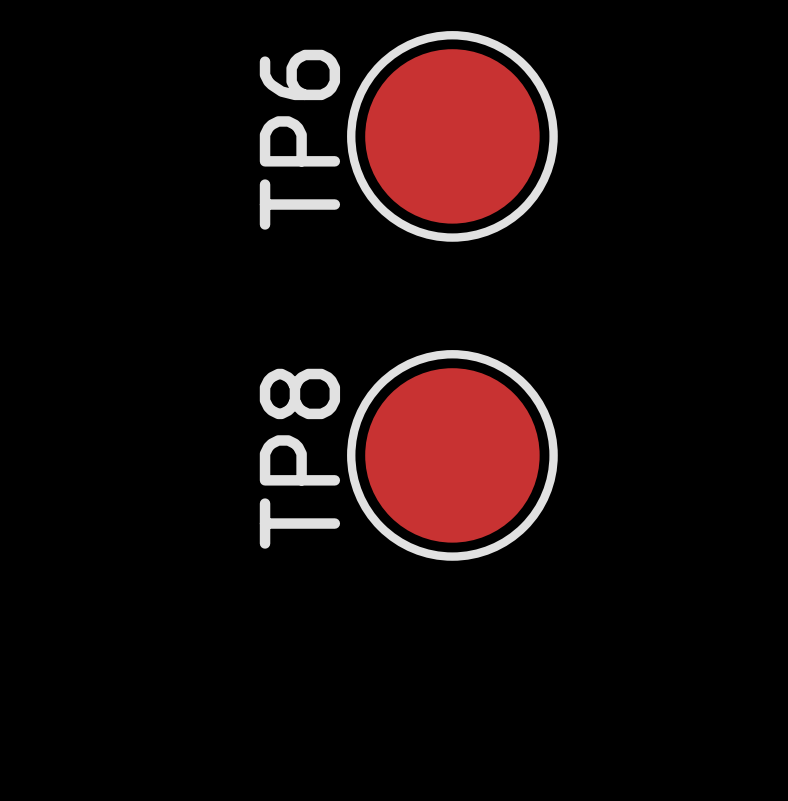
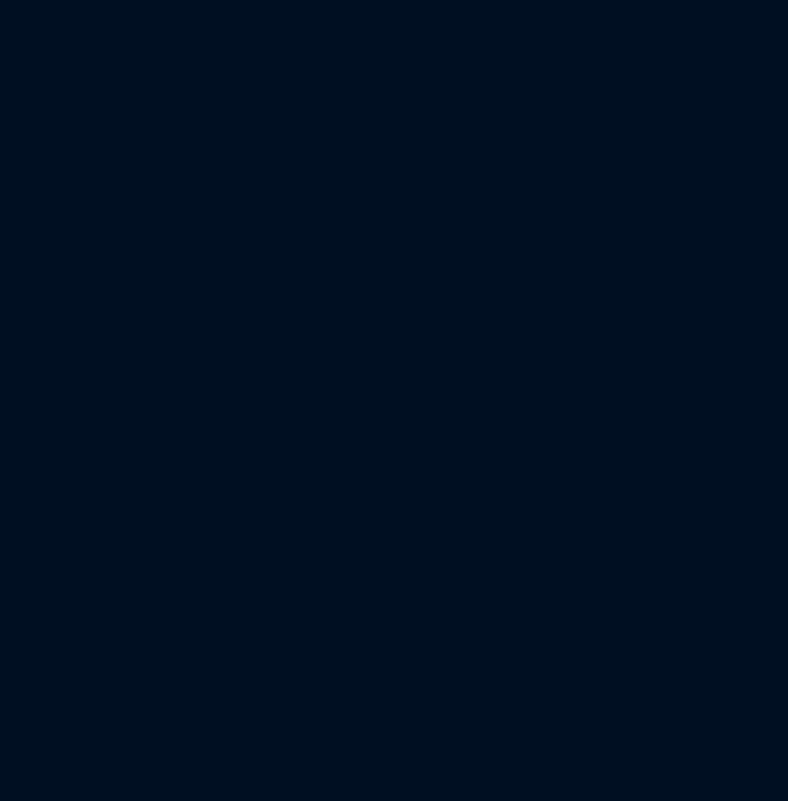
TP6: (452, 136) -> none
TP8: (452, 455) -> none

